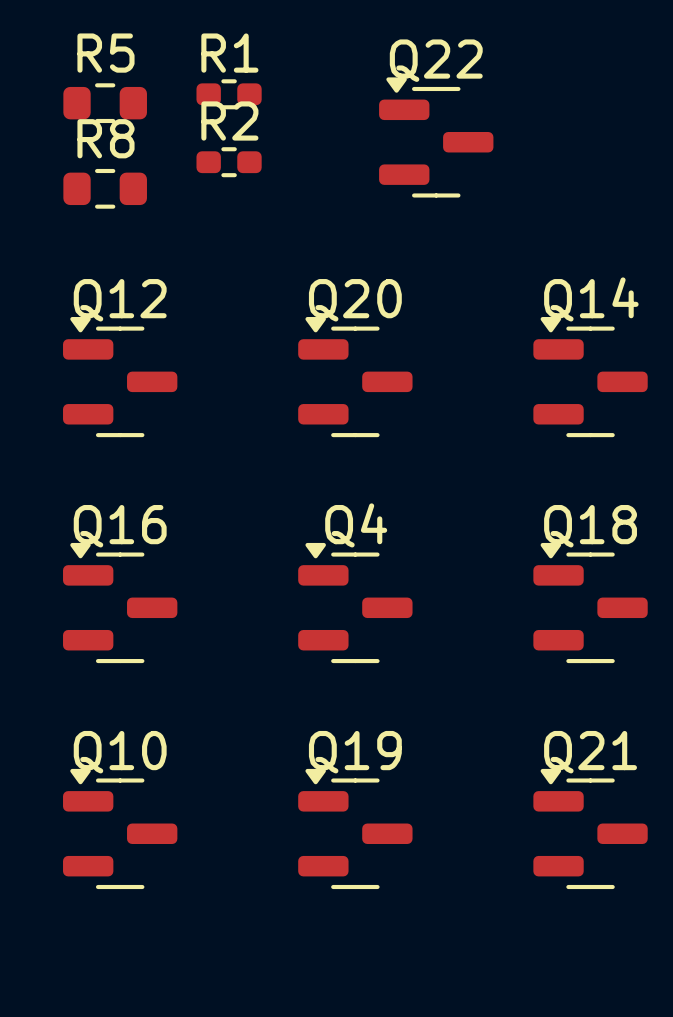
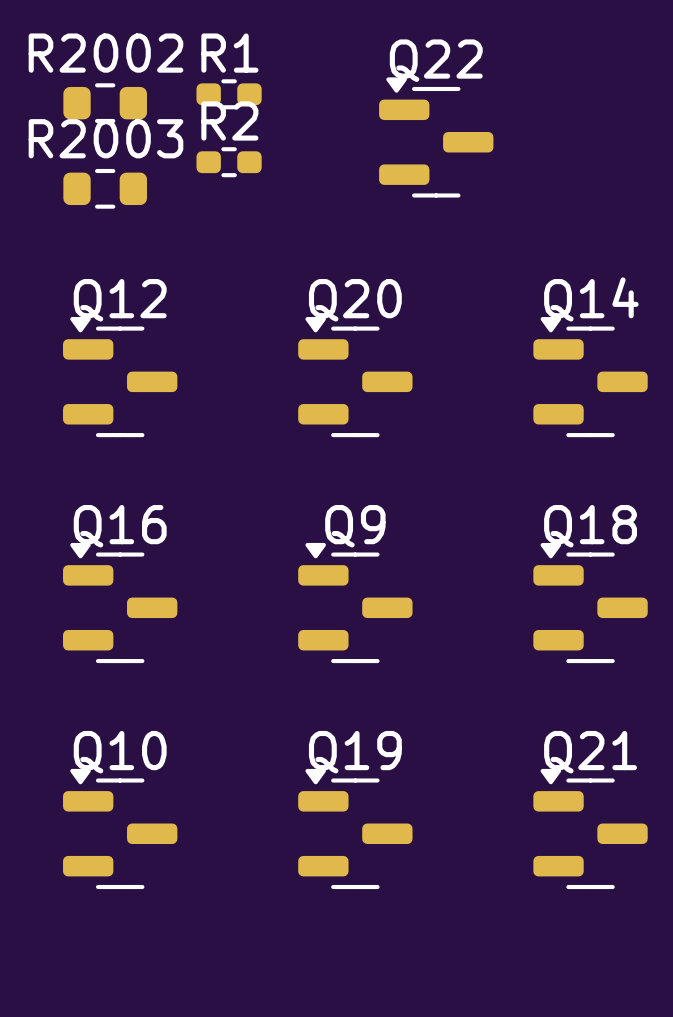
R5 name: R5 (105, 53) -> R2002 (105, 53)
R8 name: R8 (105, 138) -> R2003 (105, 138)
Q4 name: Q4 (356, 525) -> Q9 (355, 526)

